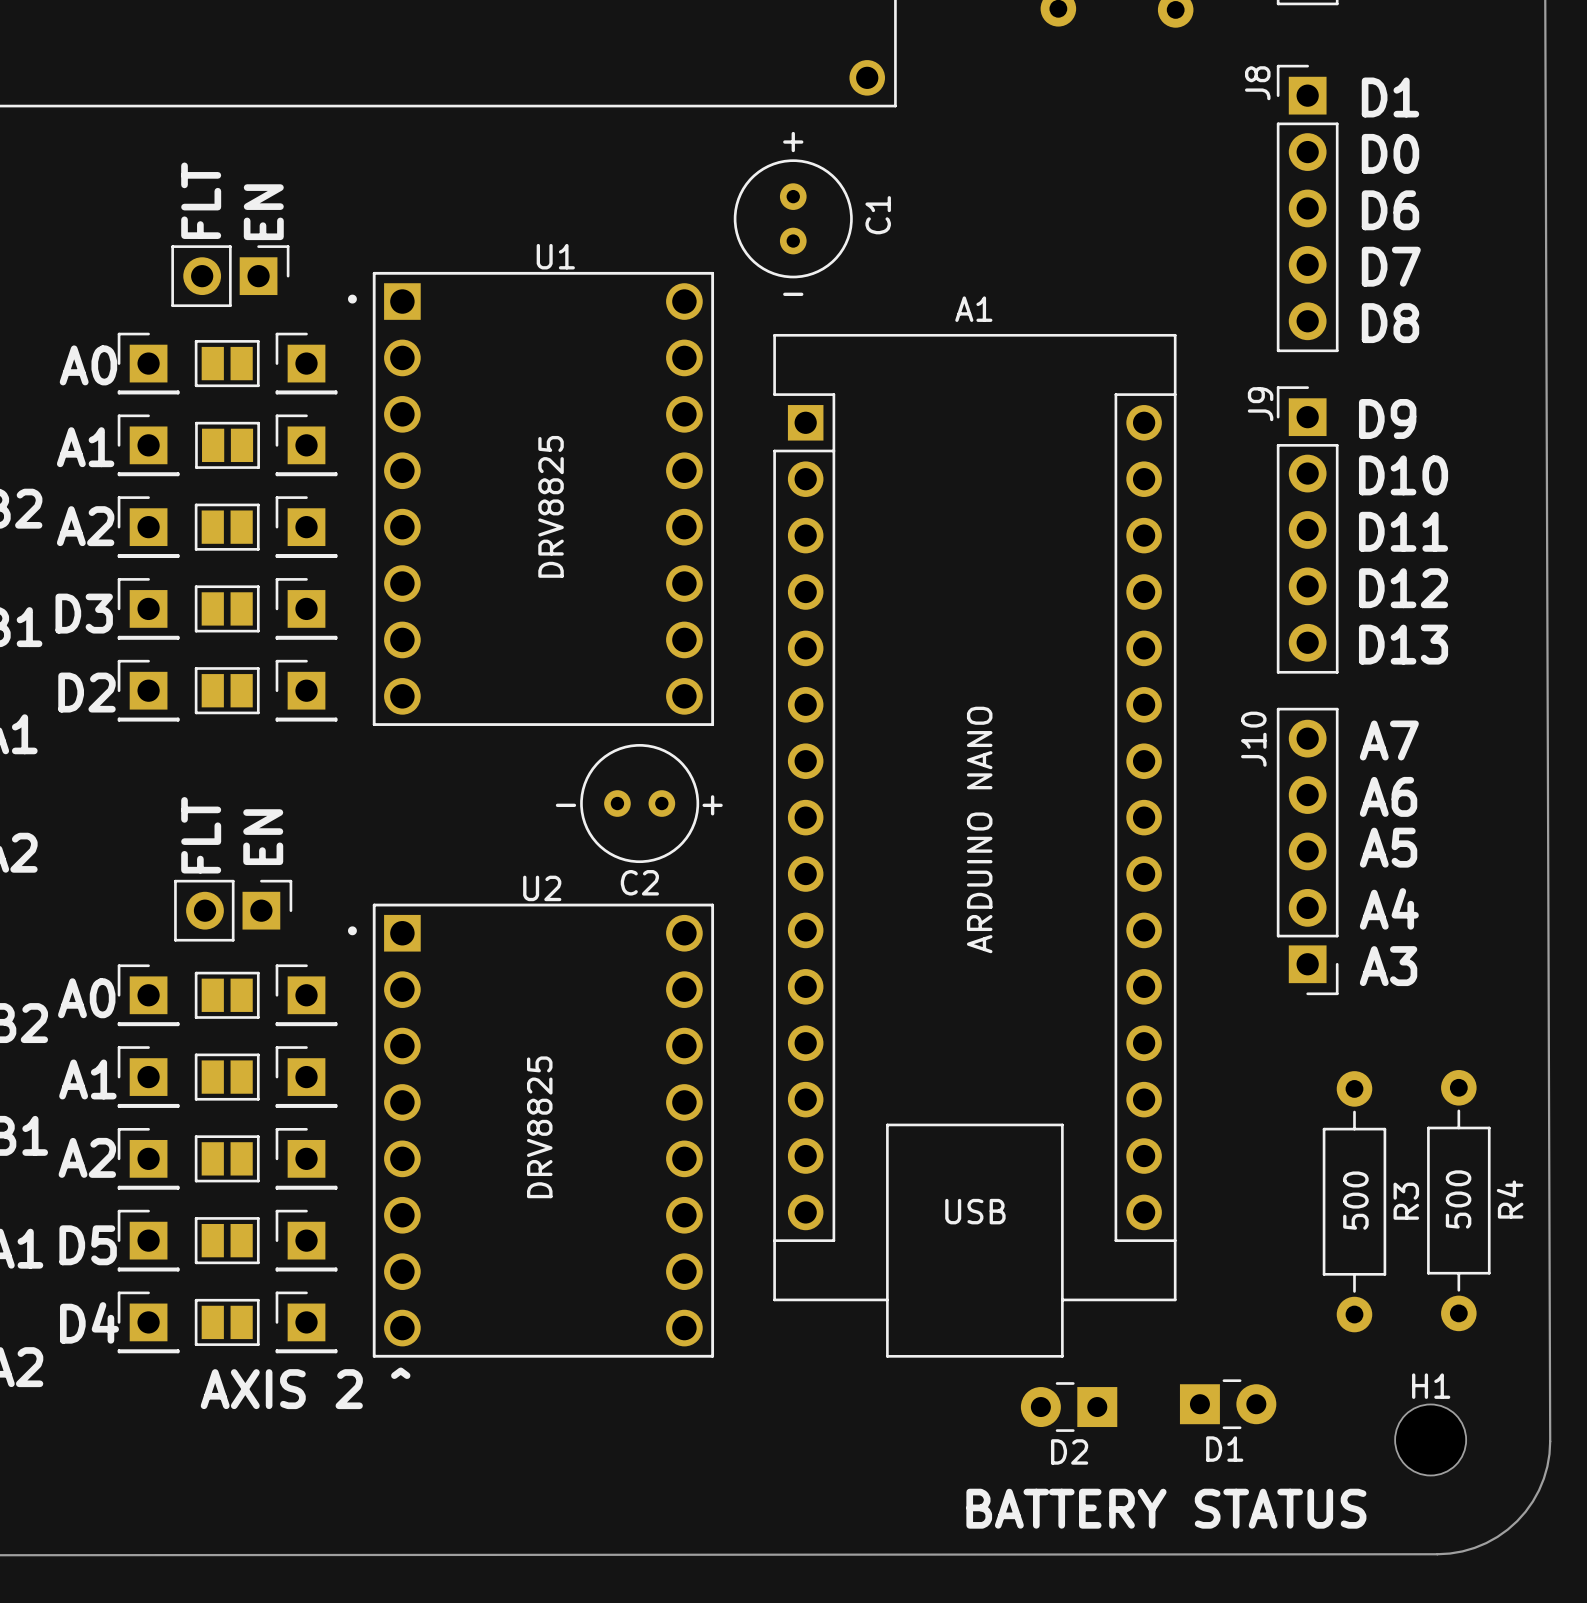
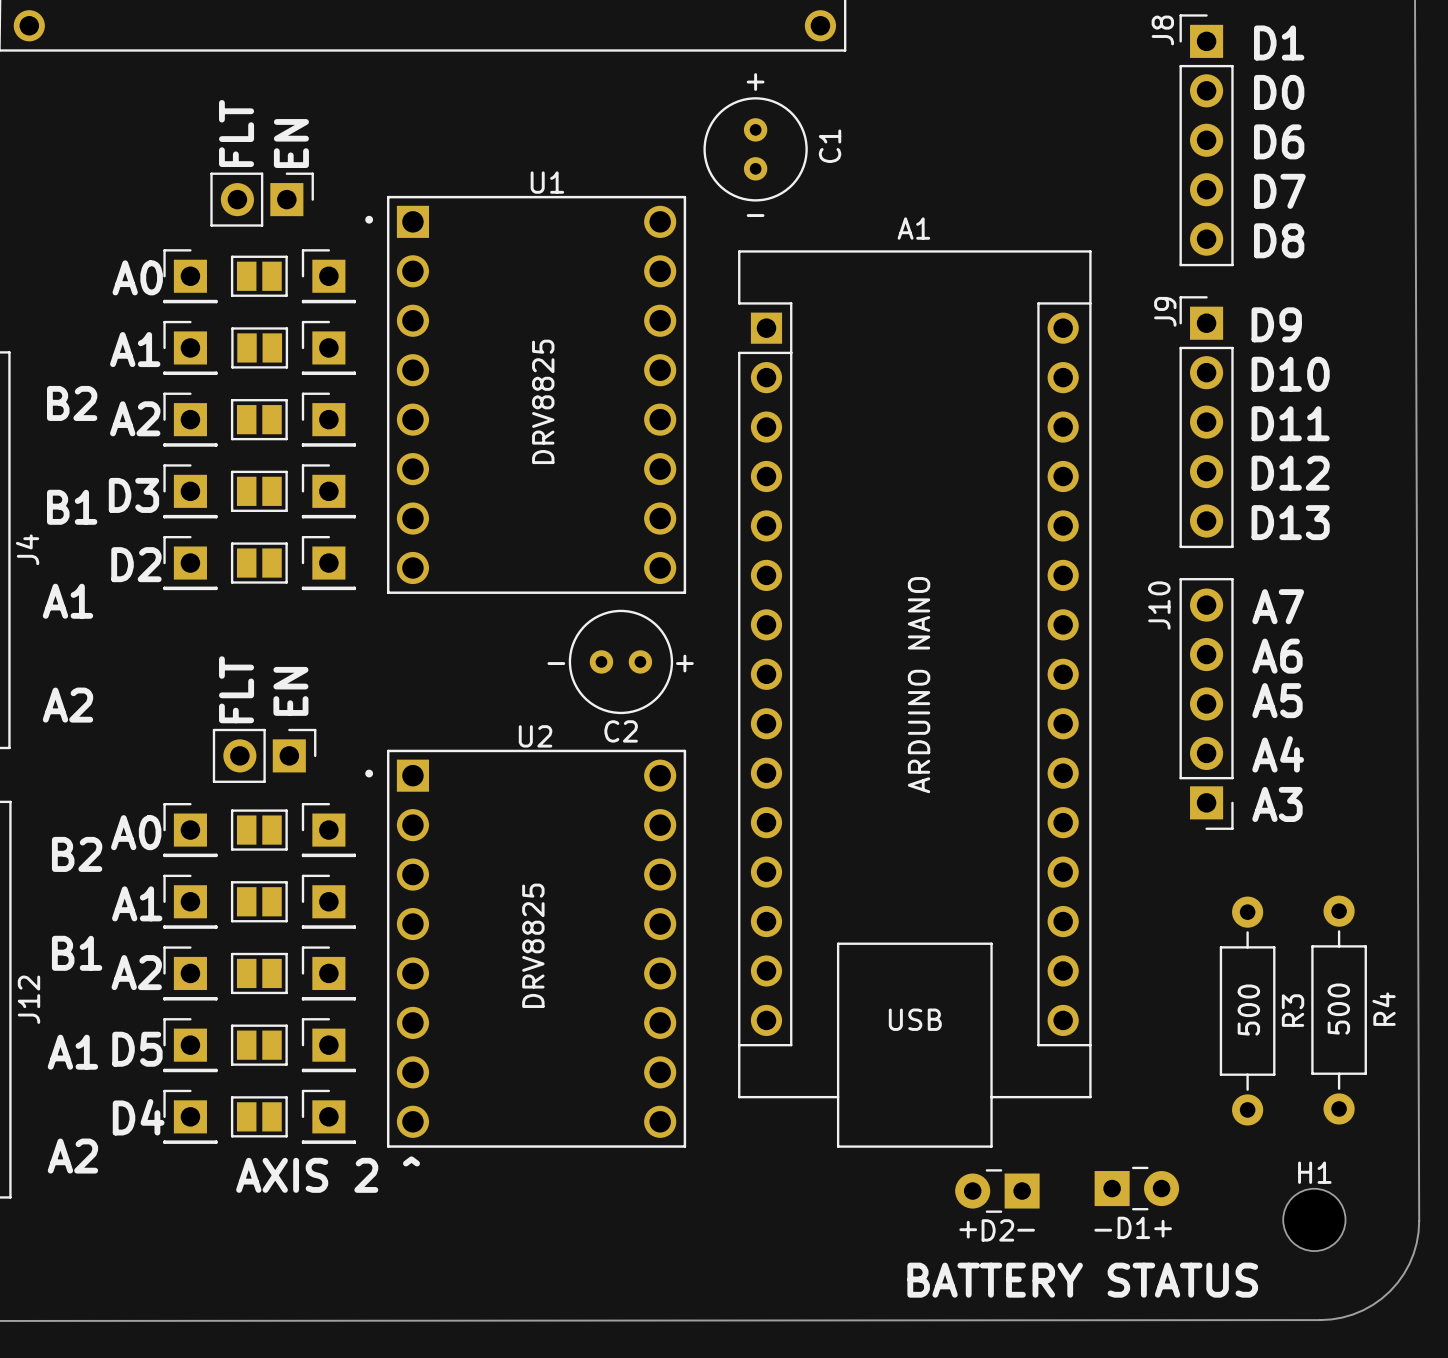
text: none -> + (1163, 1228)
text: none -> + (968, 1229)
text: none -> - (1026, 1230)
text: none -> - (1103, 1230)

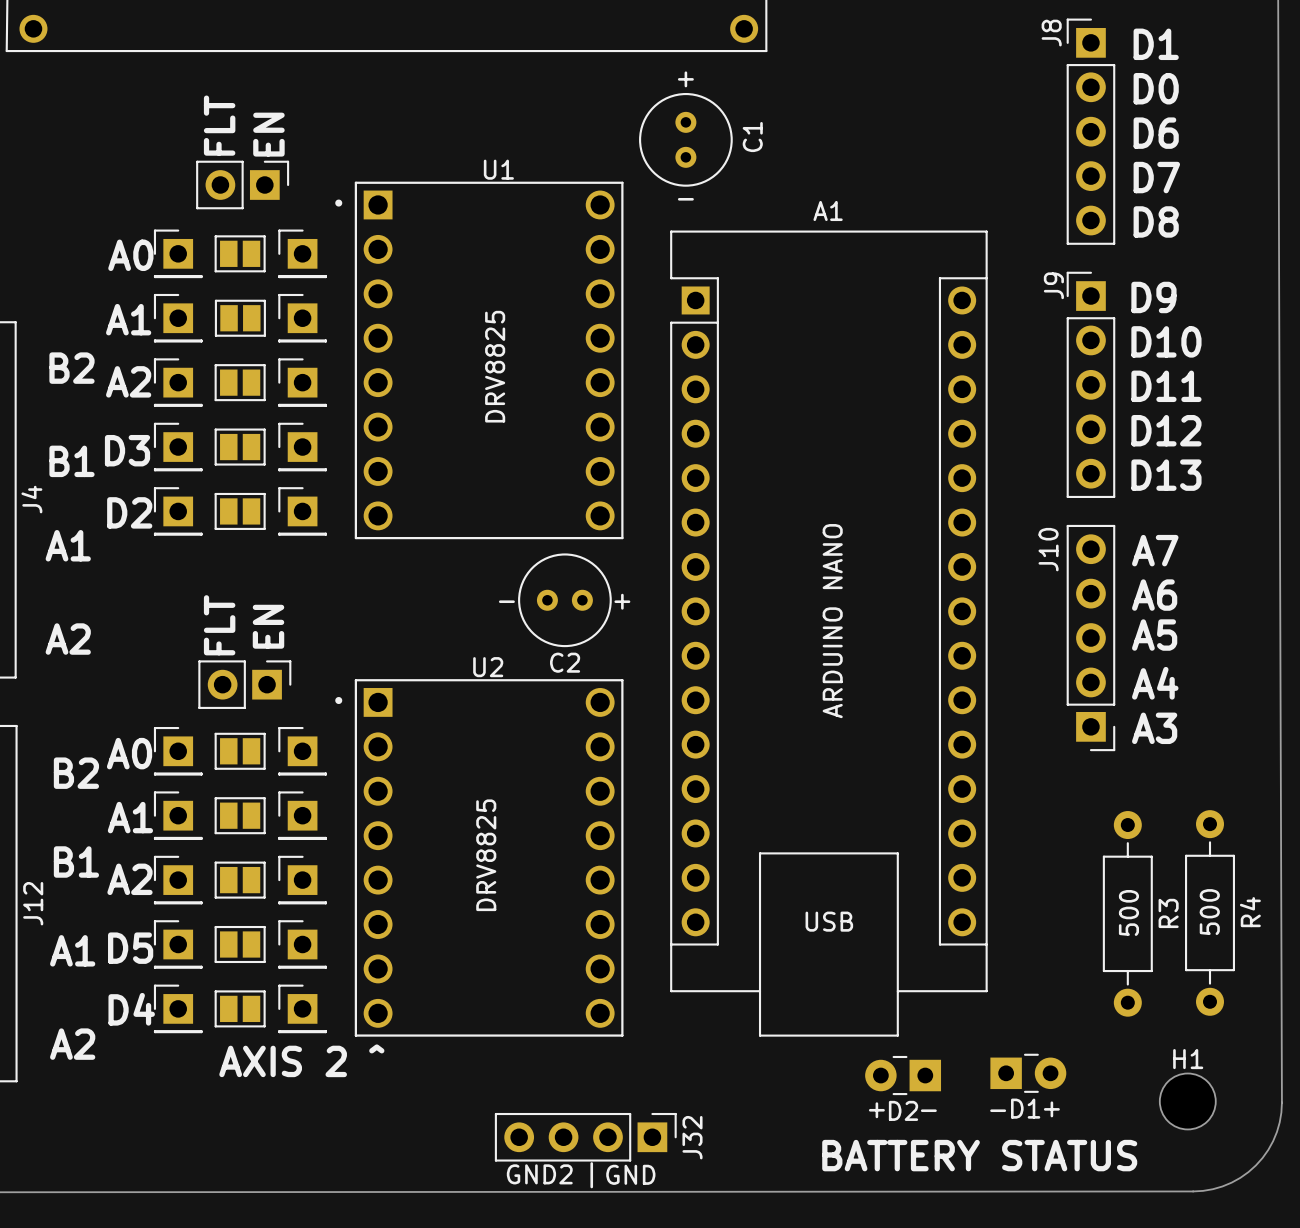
J32: none -> (585, 1137)
line: none -> (591, 1163) (591, 1187)
text: none -> GND2 (539, 1174)
text: none -> GND (630, 1174)

